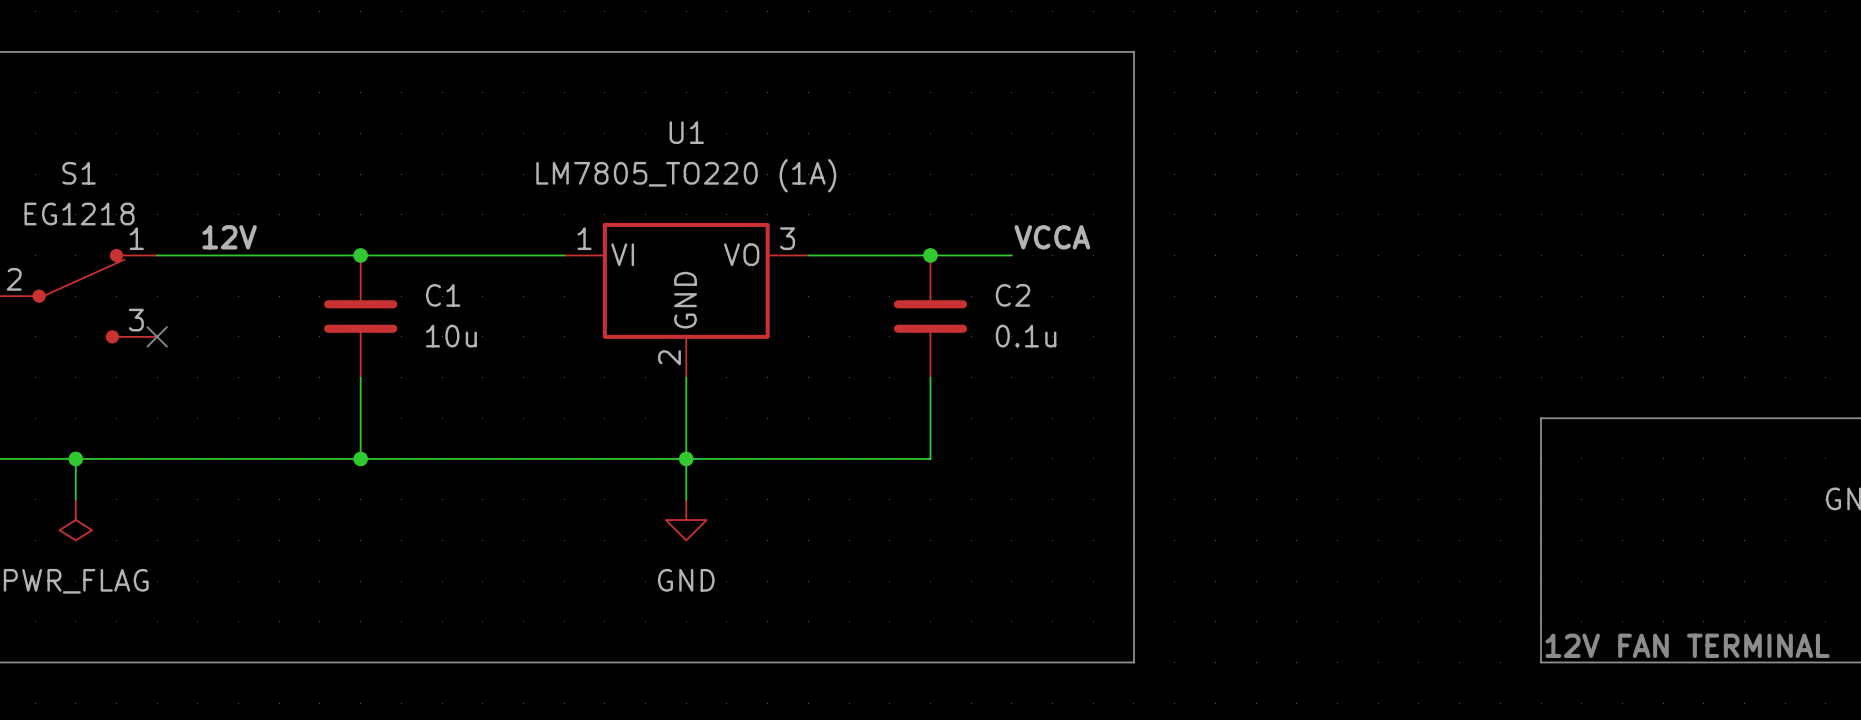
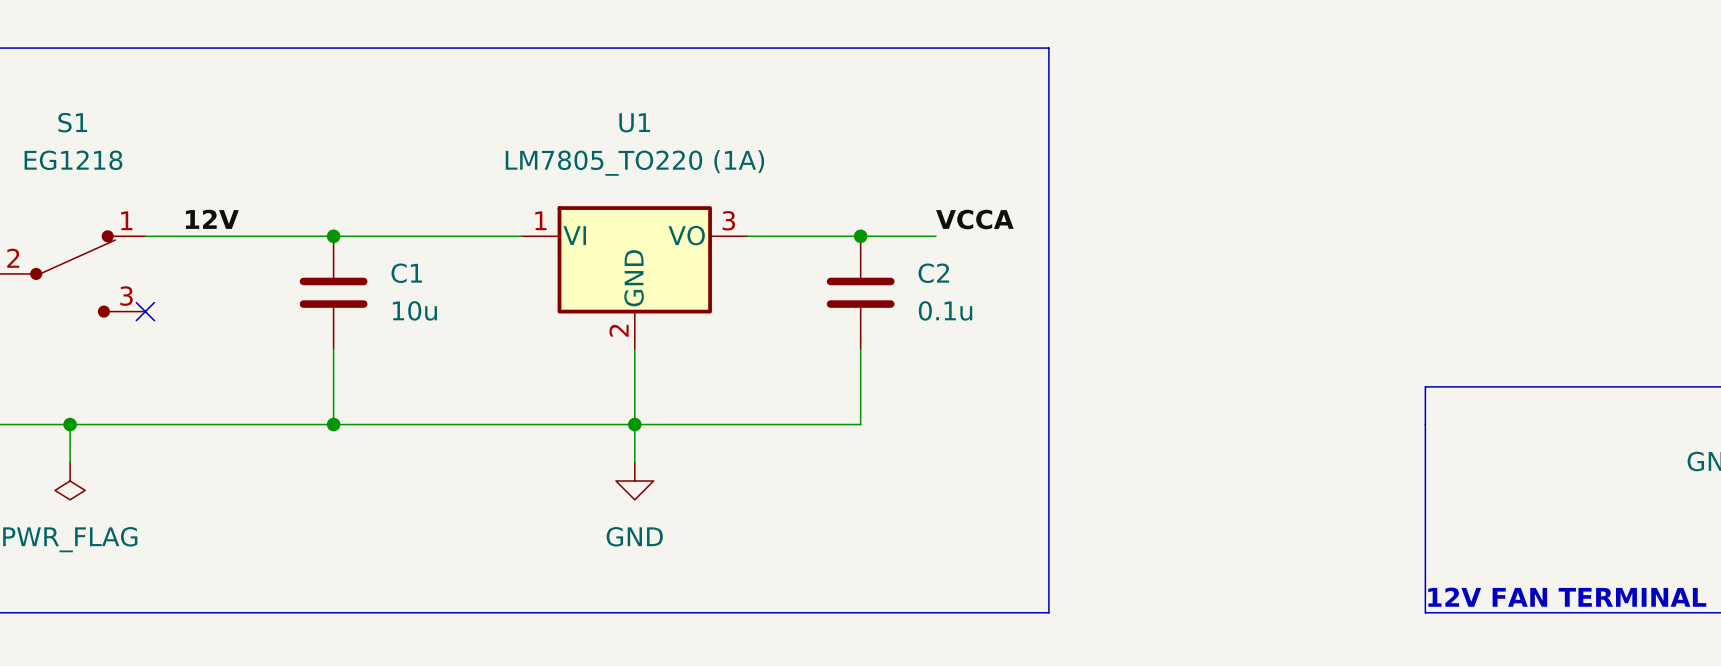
S1 name position: S1 (79, 173) -> S1 (72, 122)
S1 value position: EG1218 (79, 214) -> EG1218 (73, 160)

